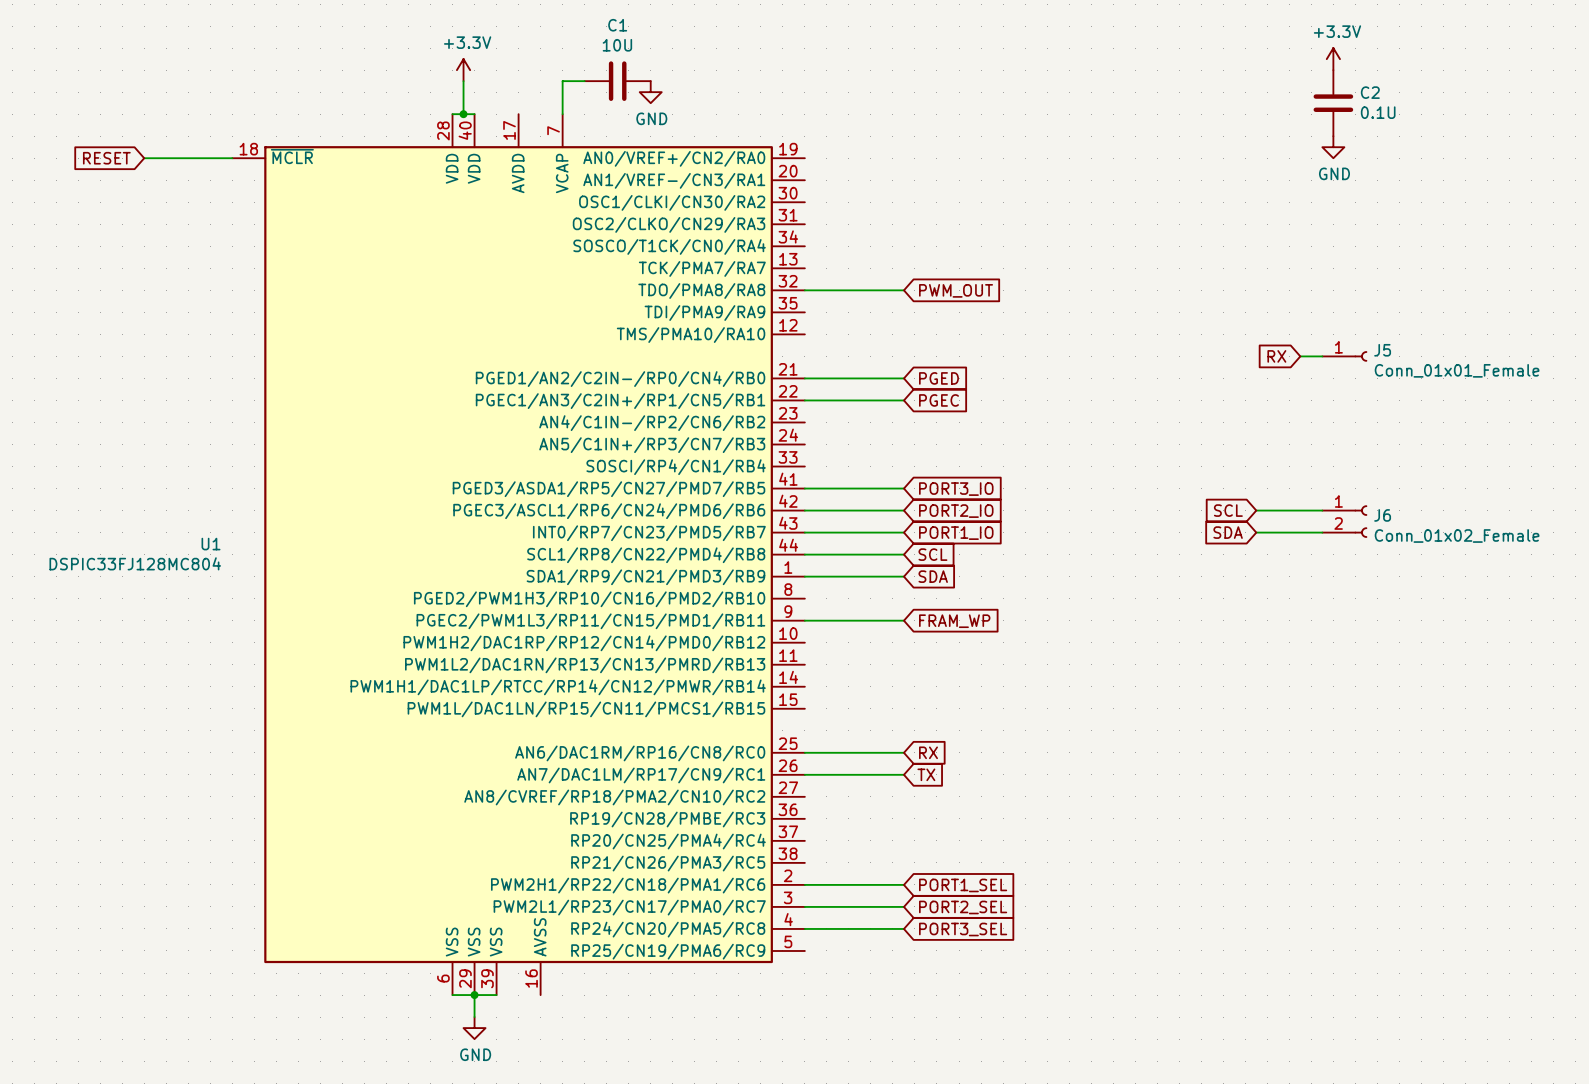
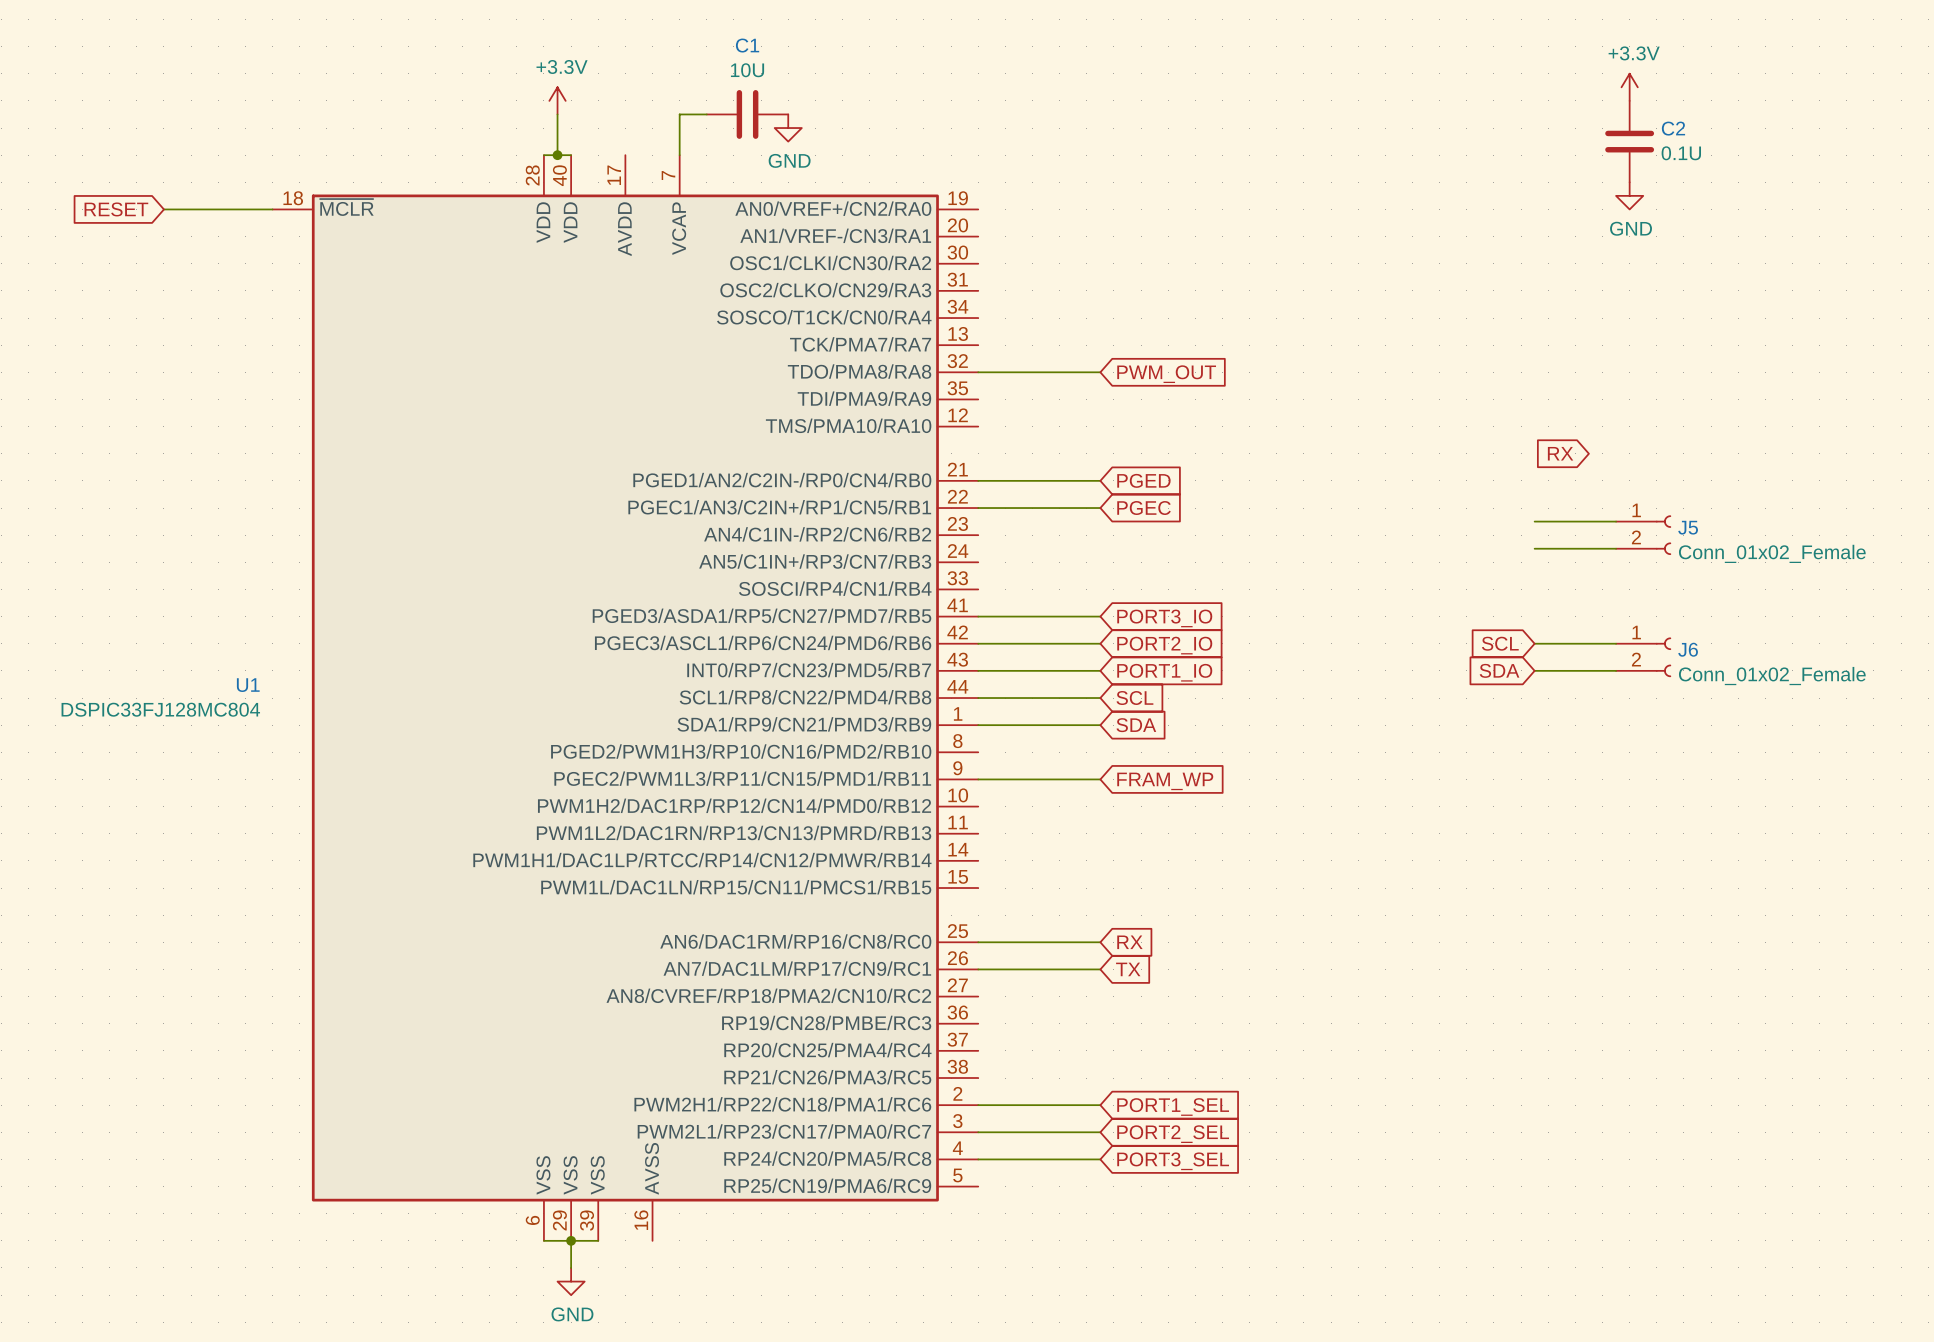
J5 symbol: [1322, 351, 1368, 362] -> [1616, 515, 1672, 555]
wire: (1300, 356) (1322, 356) -> none
J5 value: Conn_01x01_Female (1457, 370) -> Conn_01x02_Female (1772, 553)
wire: none -> (1534, 521) (1616, 521)
wire: none -> (1534, 548) (1616, 548)

